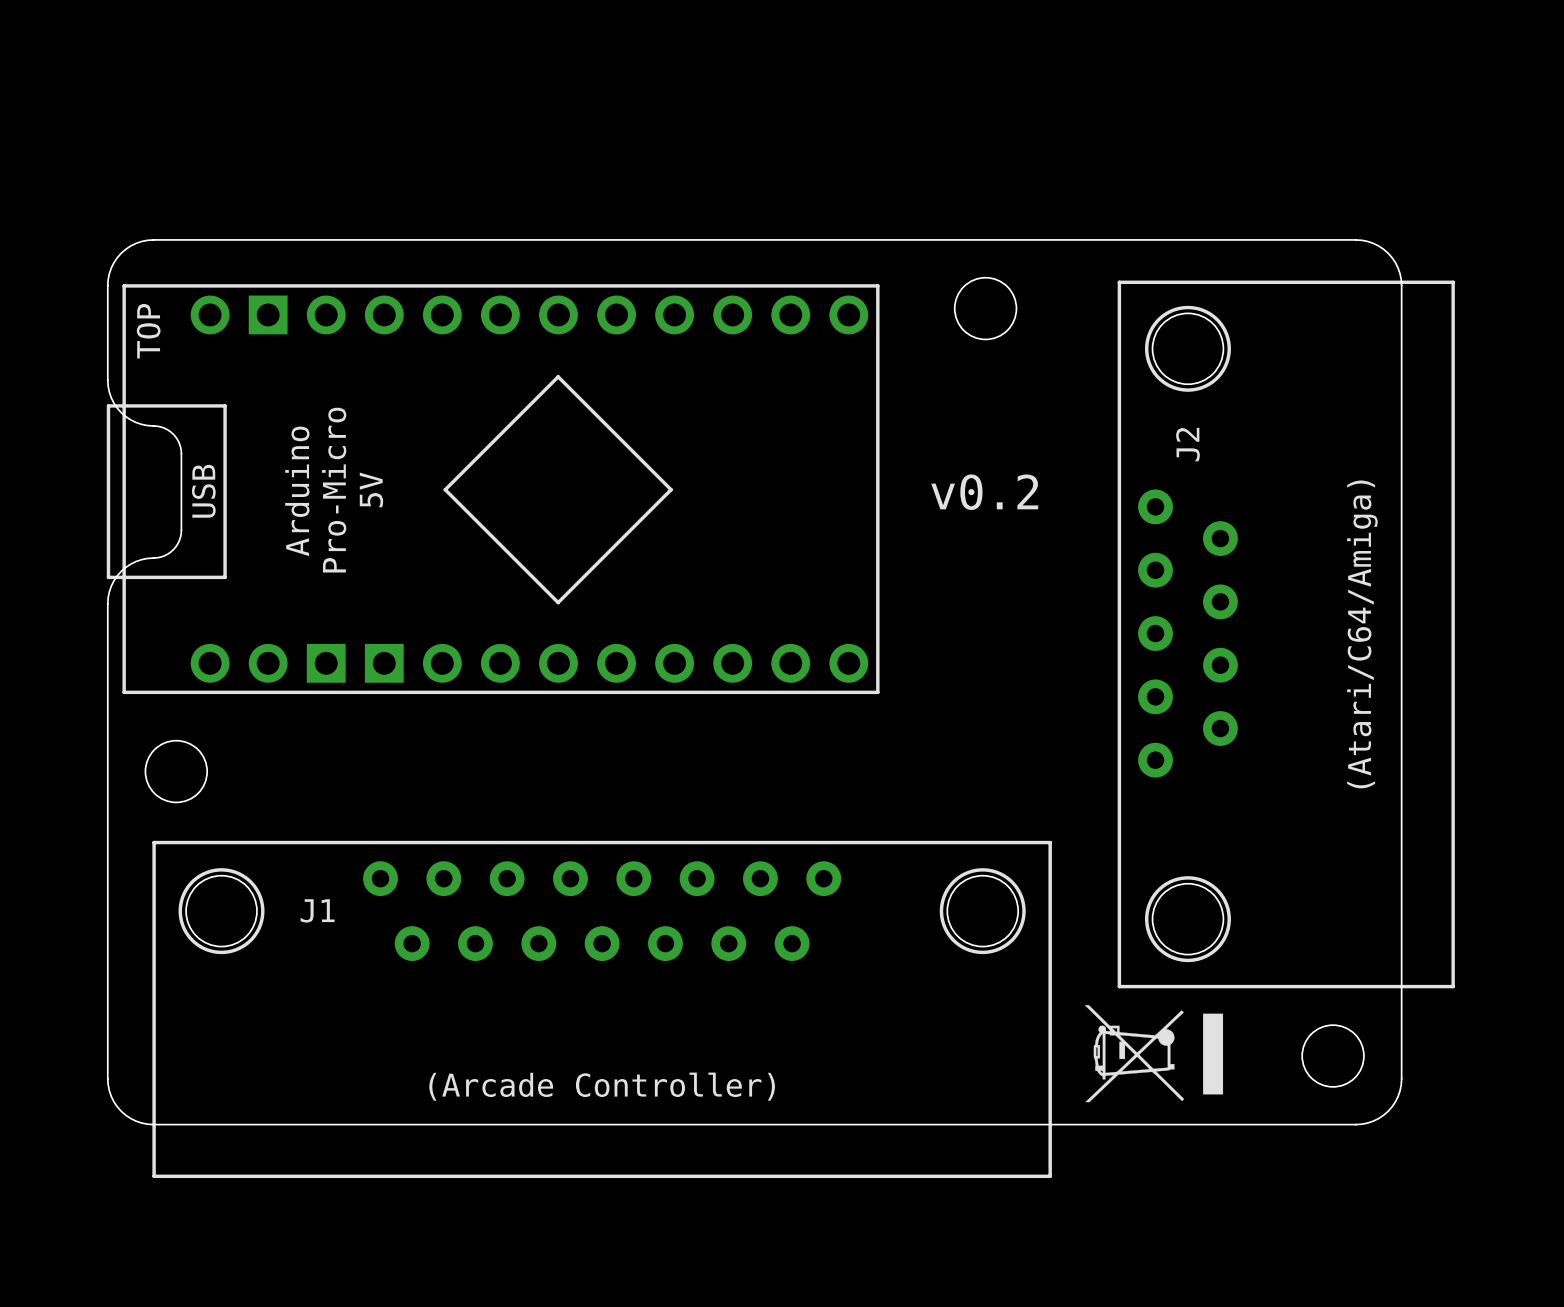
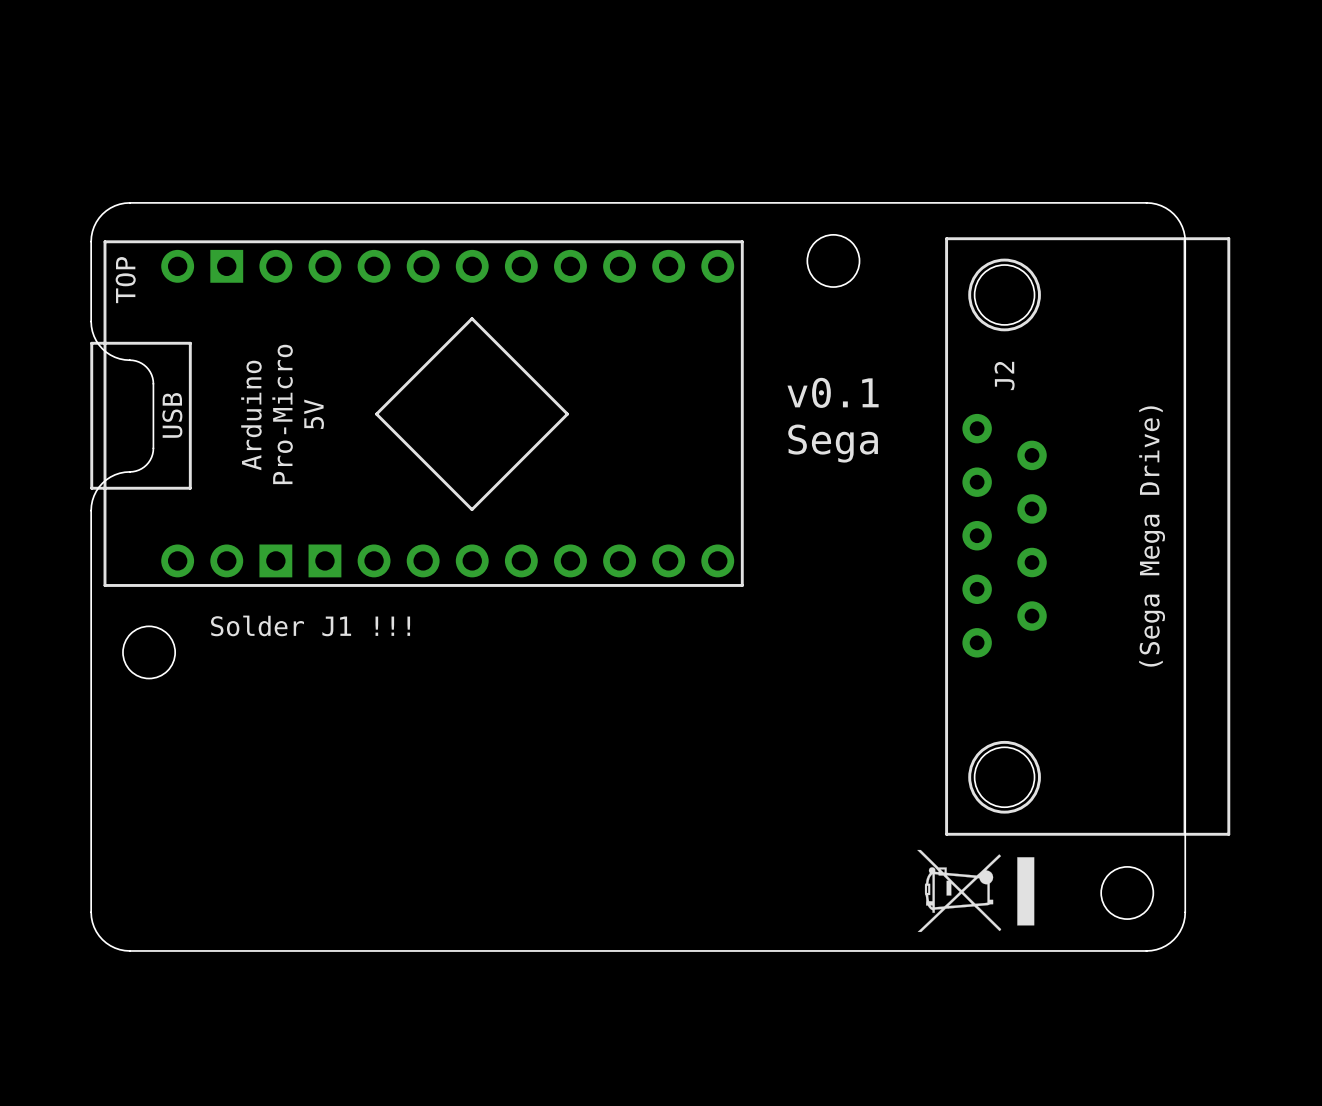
J2 footprint: [1117, 280, 1455, 989] -> [945, 237, 1231, 836]
text: v0.2 (984, 492) -> v0.1 (833, 392)
text: none -> Sega (833, 443)
text: (Atari/C64/Amiga) (1362, 634) -> (Sega Mega Drive) (1152, 536)
text: none -> Solder J1 !!! (310, 625)
J1: (602, 1009) -> none
text: (Arcade Controller) (602, 1086) -> none

